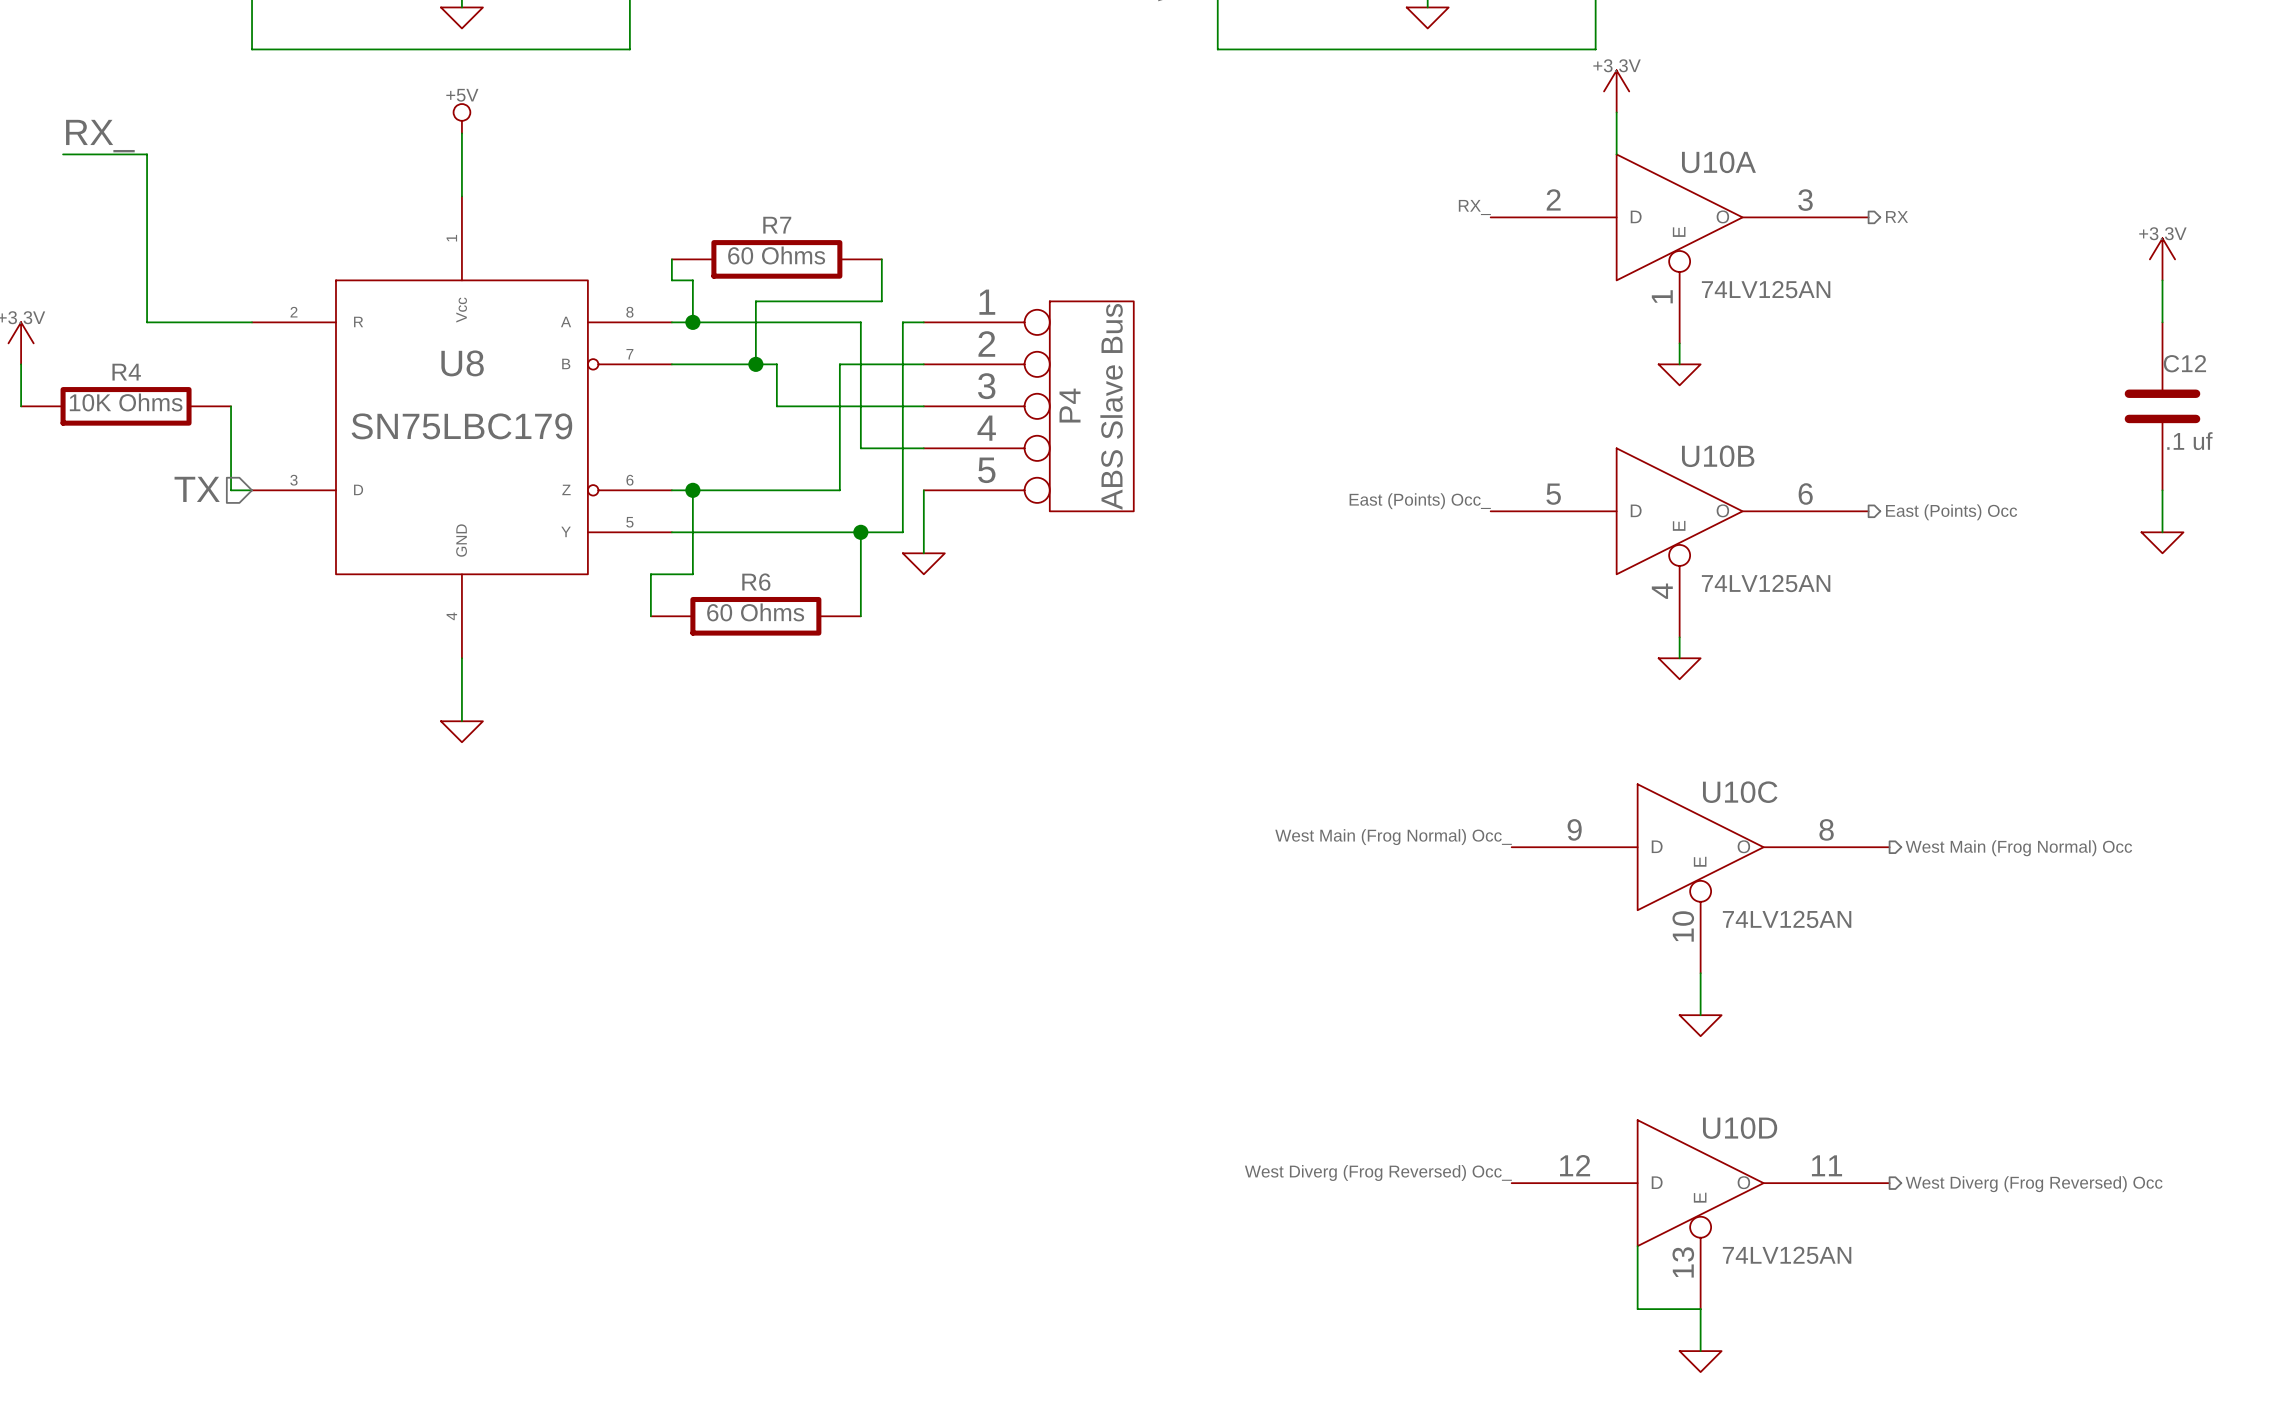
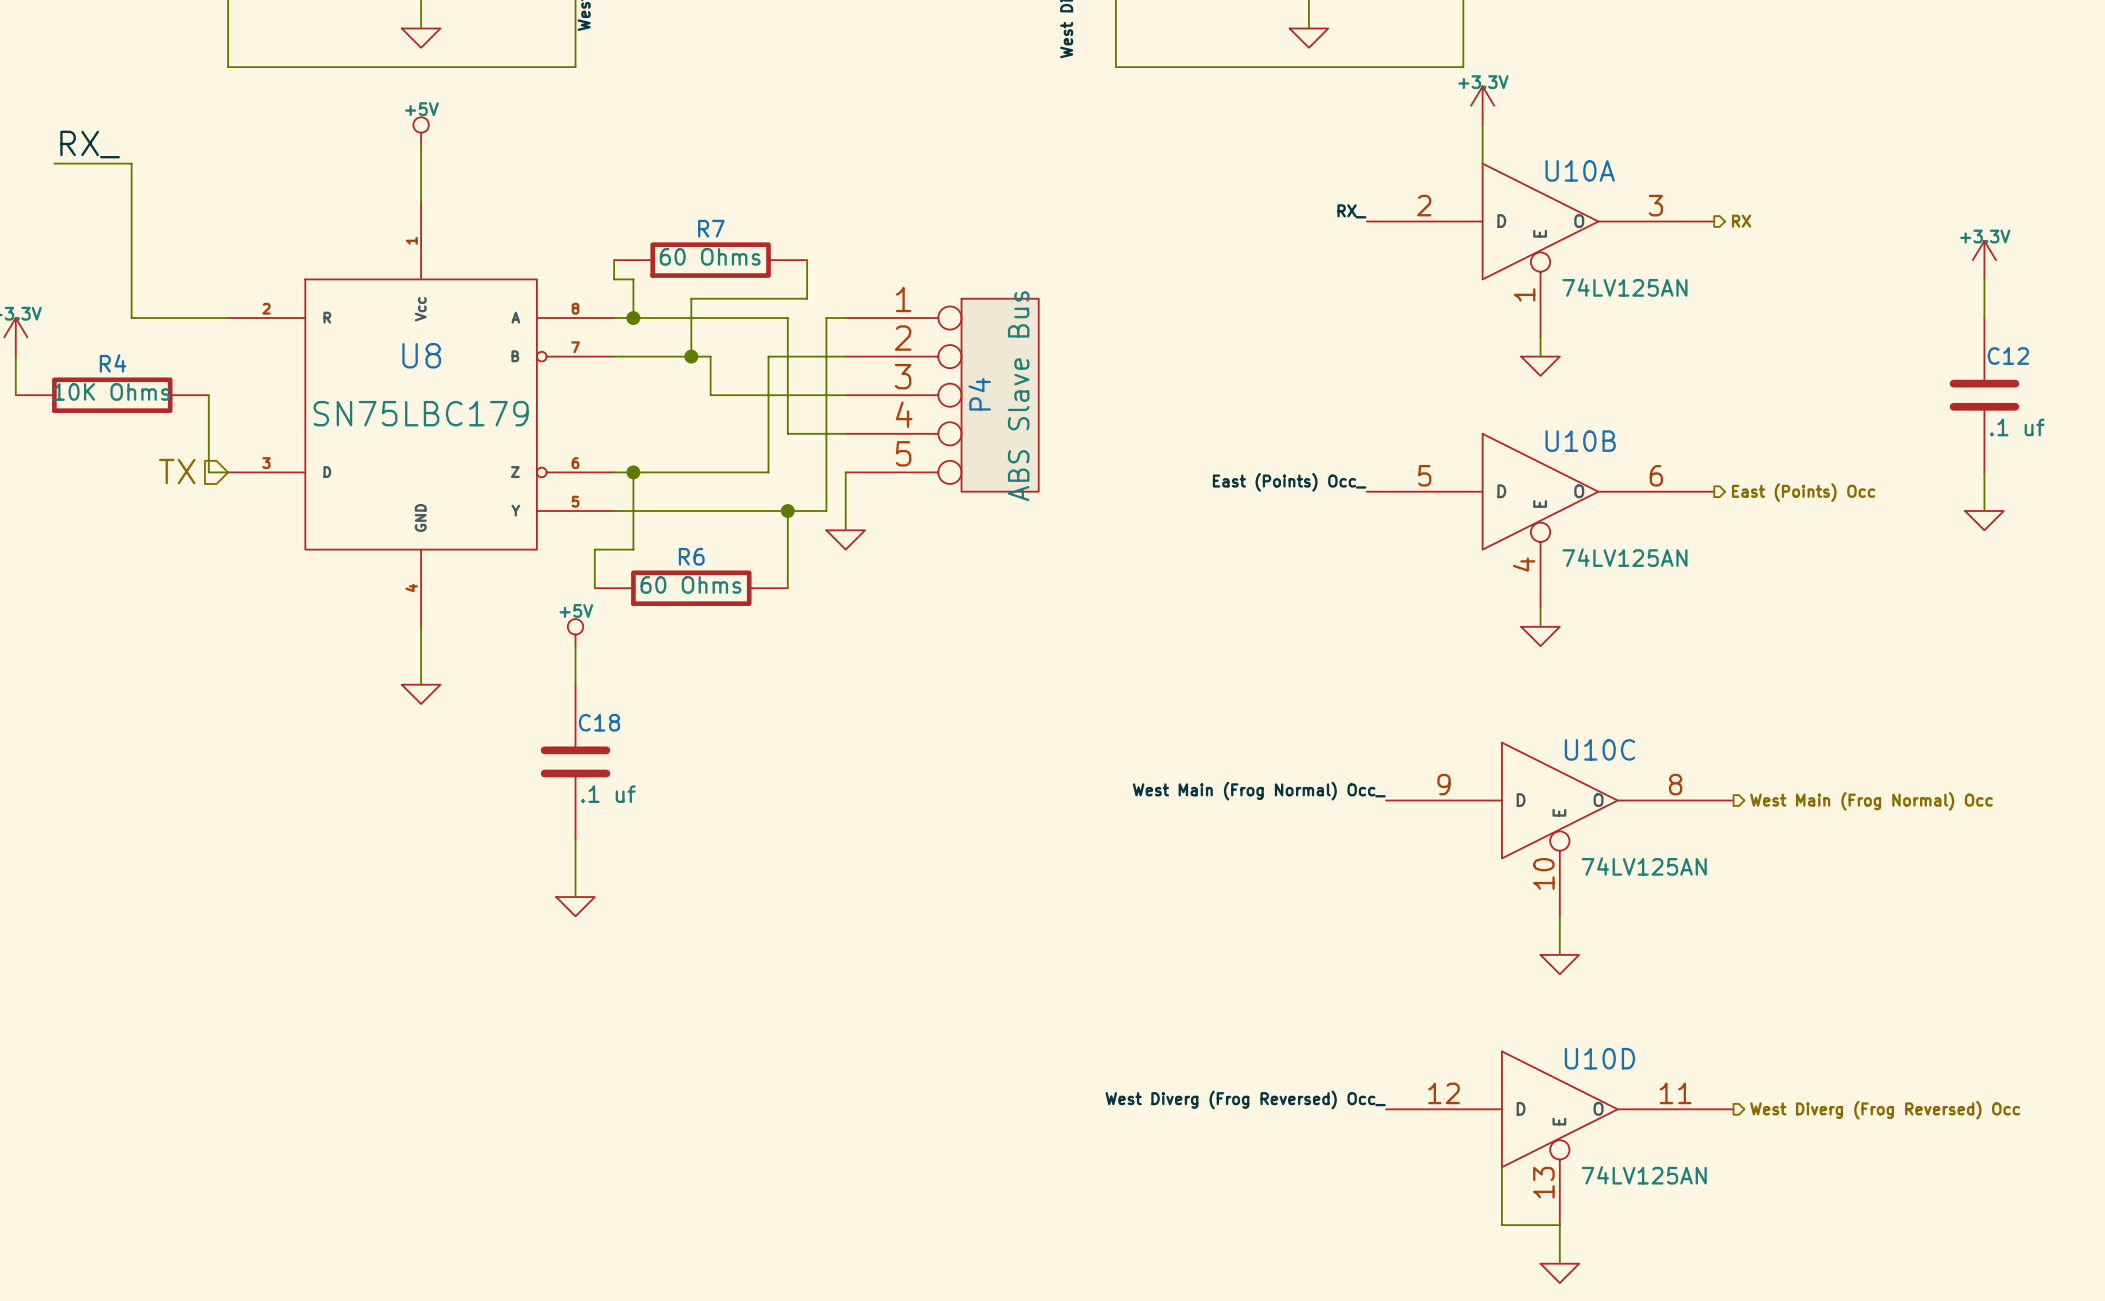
power symbol: none -> +5V (575, 632)
wire: none -> (575, 646) (575, 684)
C18: none -> .1 uf (575, 761)
wire: none -> (575, 839) (575, 897)
power symbol: none -> (575, 906)

